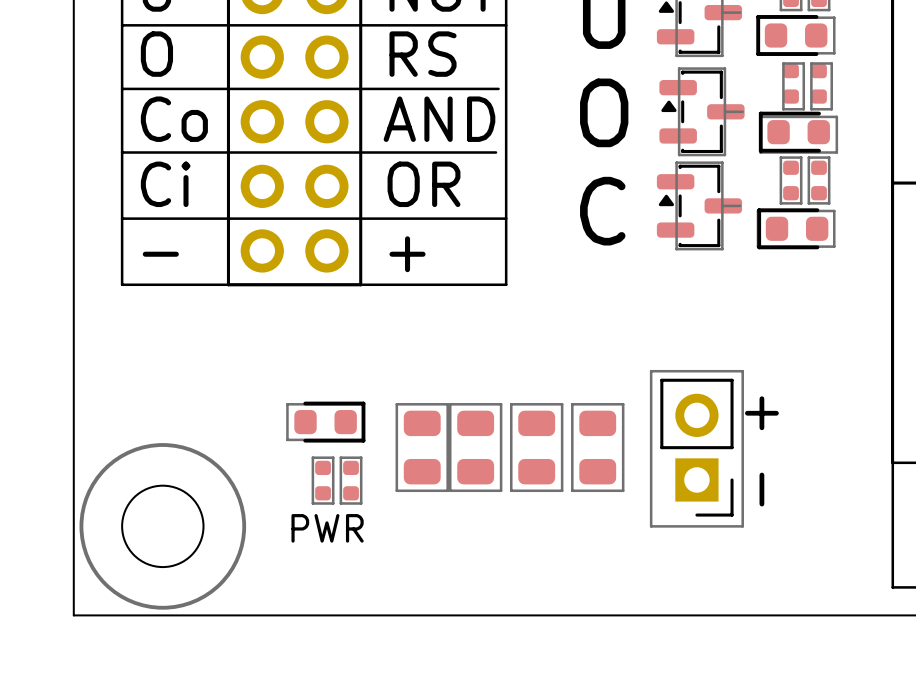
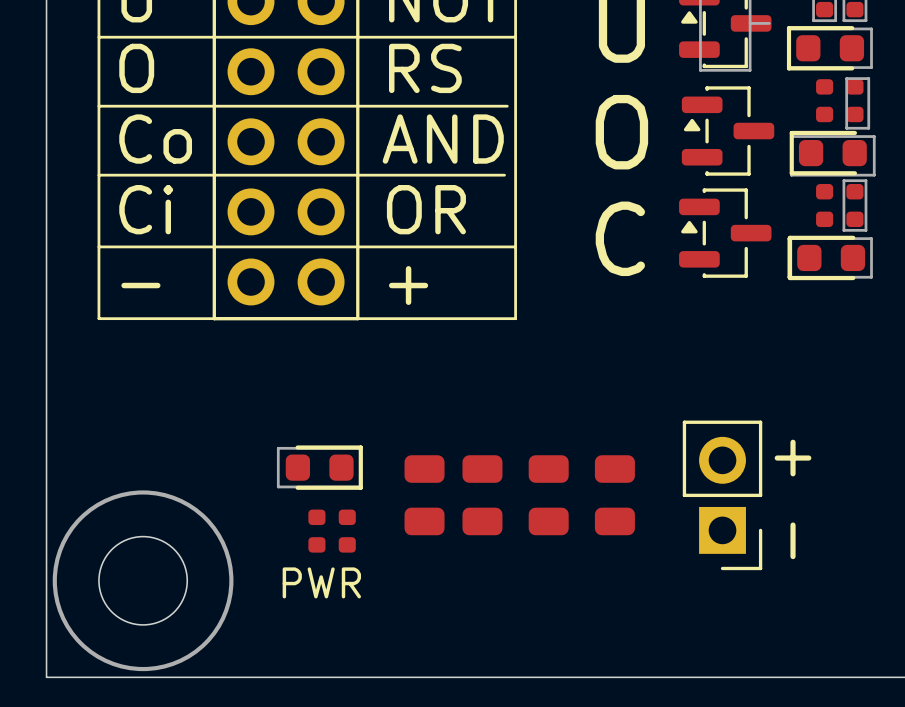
line: (783, 63) (803, 63) (803, 109) (783, 109) (783, 63) -> none
line: (679, 68) (724, 68) (724, 155) (679, 155) (679, 68) -> none
line: (724, 111) (742, 111) -> none
line: (780, 157) (780, 203) (801, 203) (801, 157) (780, 157) -> none
line: (676, 162) (676, 249) (722, 249) (722, 162) (676, 162) -> none
line: (722, 205) (740, 205) -> none
line: (651, 371) (742, 371) (742, 526) (651, 526) (651, 371) -> none
line: (396, 404) (447, 404) (447, 490) (396, 490) (396, 404) -> none
line: (450, 404) (501, 404) (501, 490) (450, 490) (450, 404) -> none
line: (511, 404) (562, 404) (562, 490) (511, 490) (511, 404) -> none
line: (572, 404) (623, 404) (623, 490) (572, 490) (572, 404) -> none
line: (312, 457) (333, 457) (333, 503) (312, 503) (312, 457) -> none
line: (340, 457) (361, 457) (361, 503) (340, 503) (340, 457) -> none

